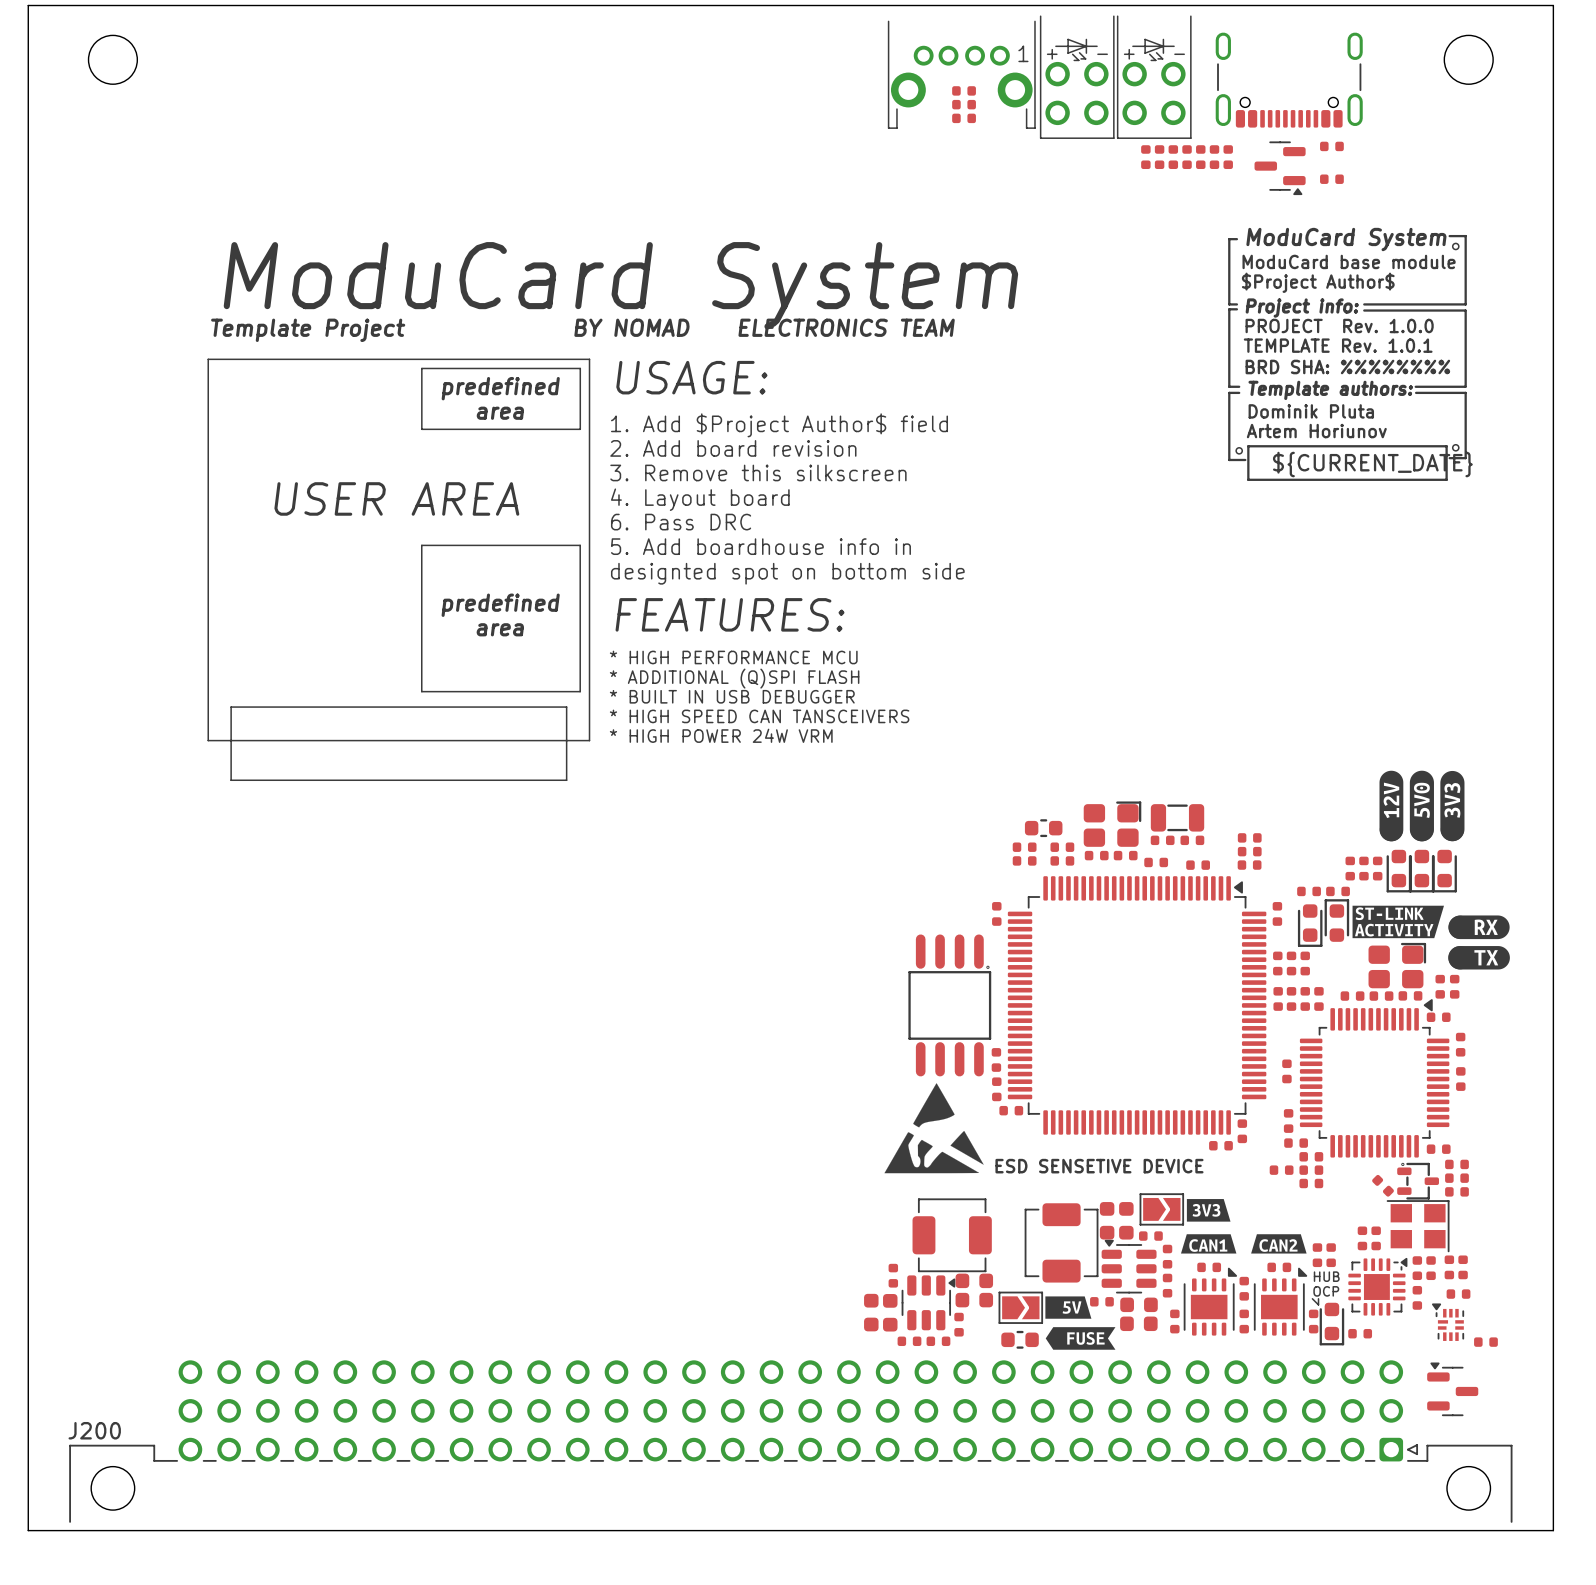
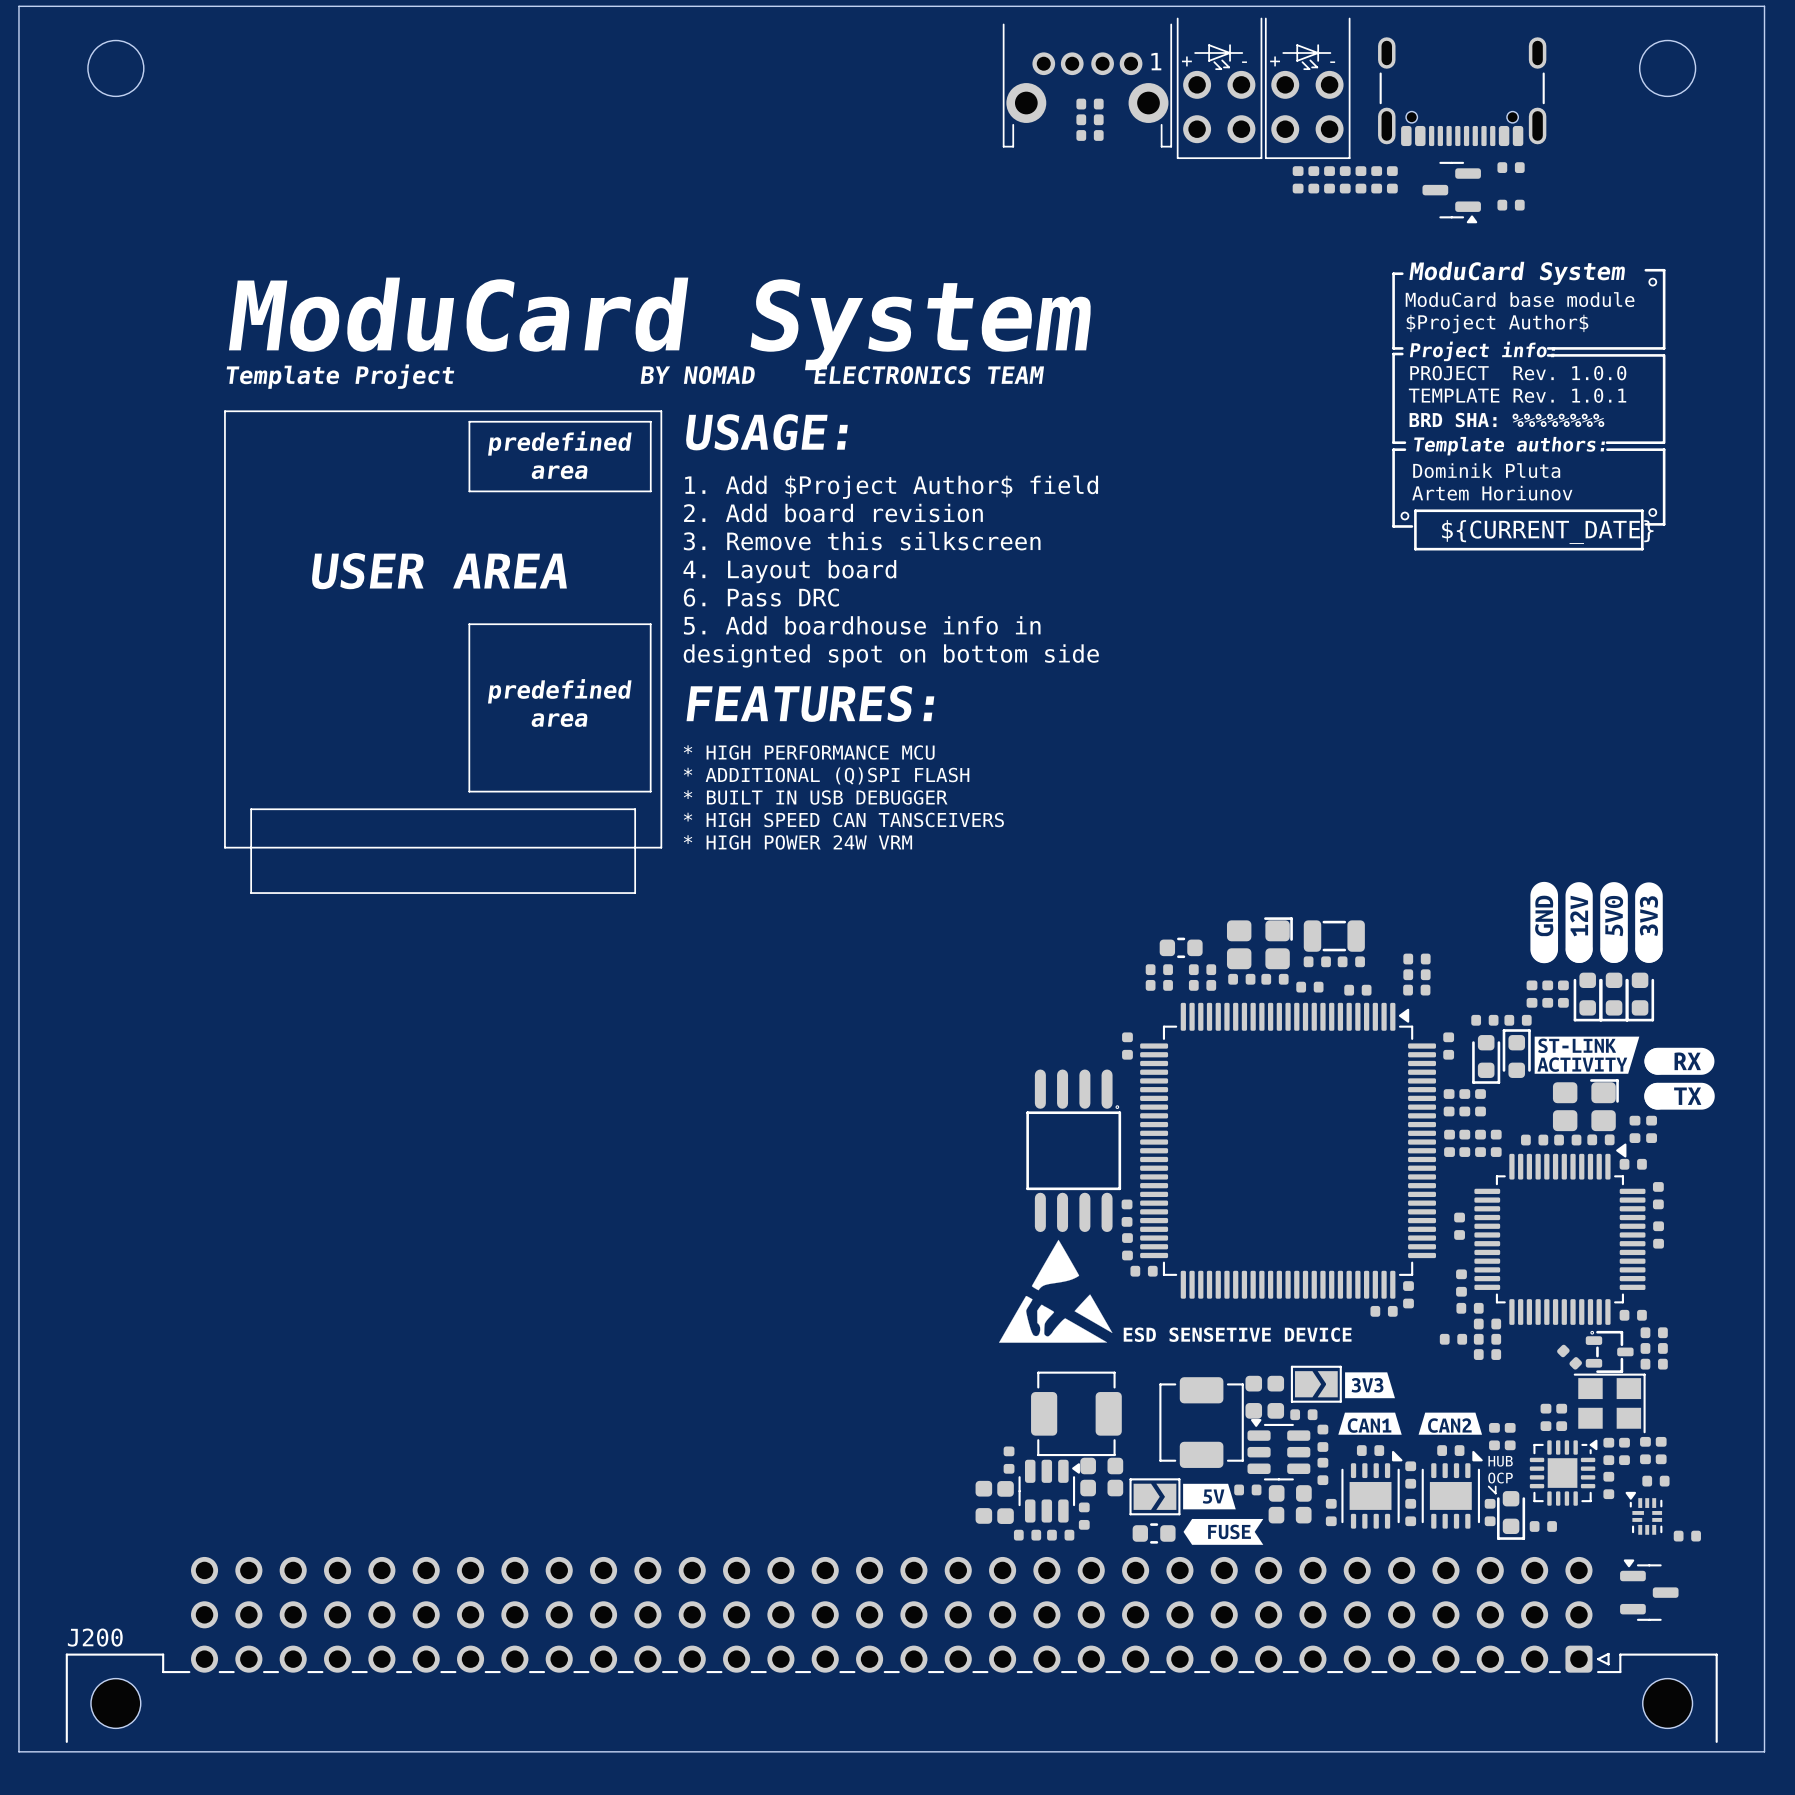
drawing: none -> [1530, 881, 1559, 964]

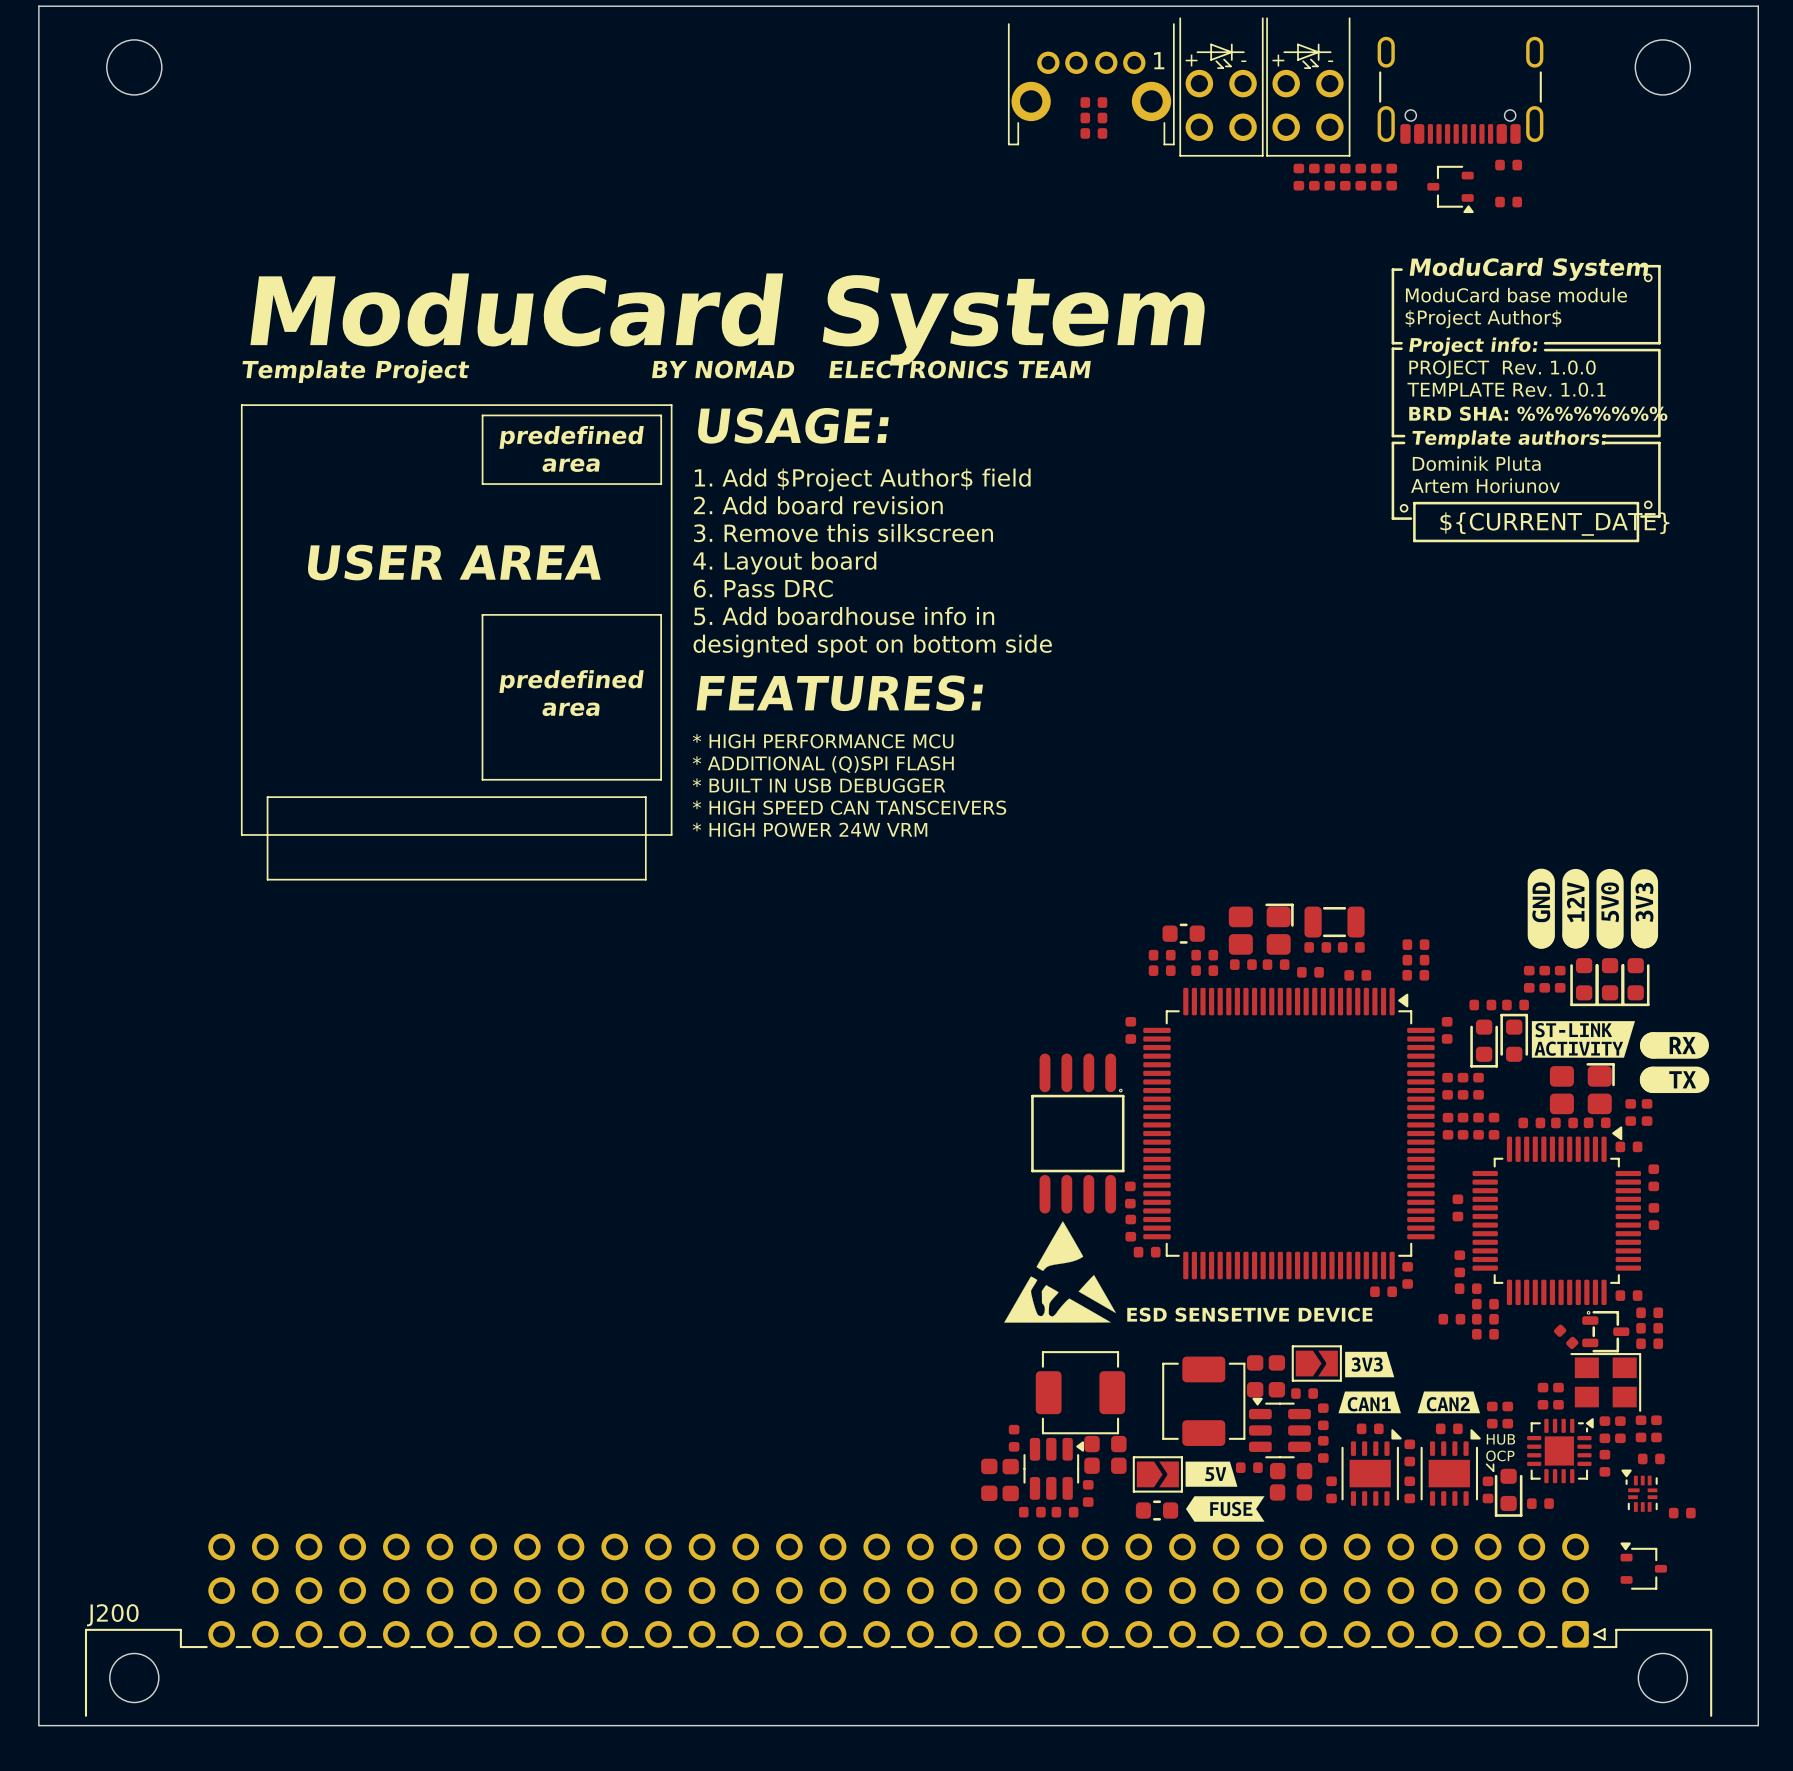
part footprint: [1422, 161, 1481, 224] -> [1427, 165, 1474, 214]
part footprint: [1620, 1559, 1679, 1621] -> [1620, 1542, 1667, 1590]

